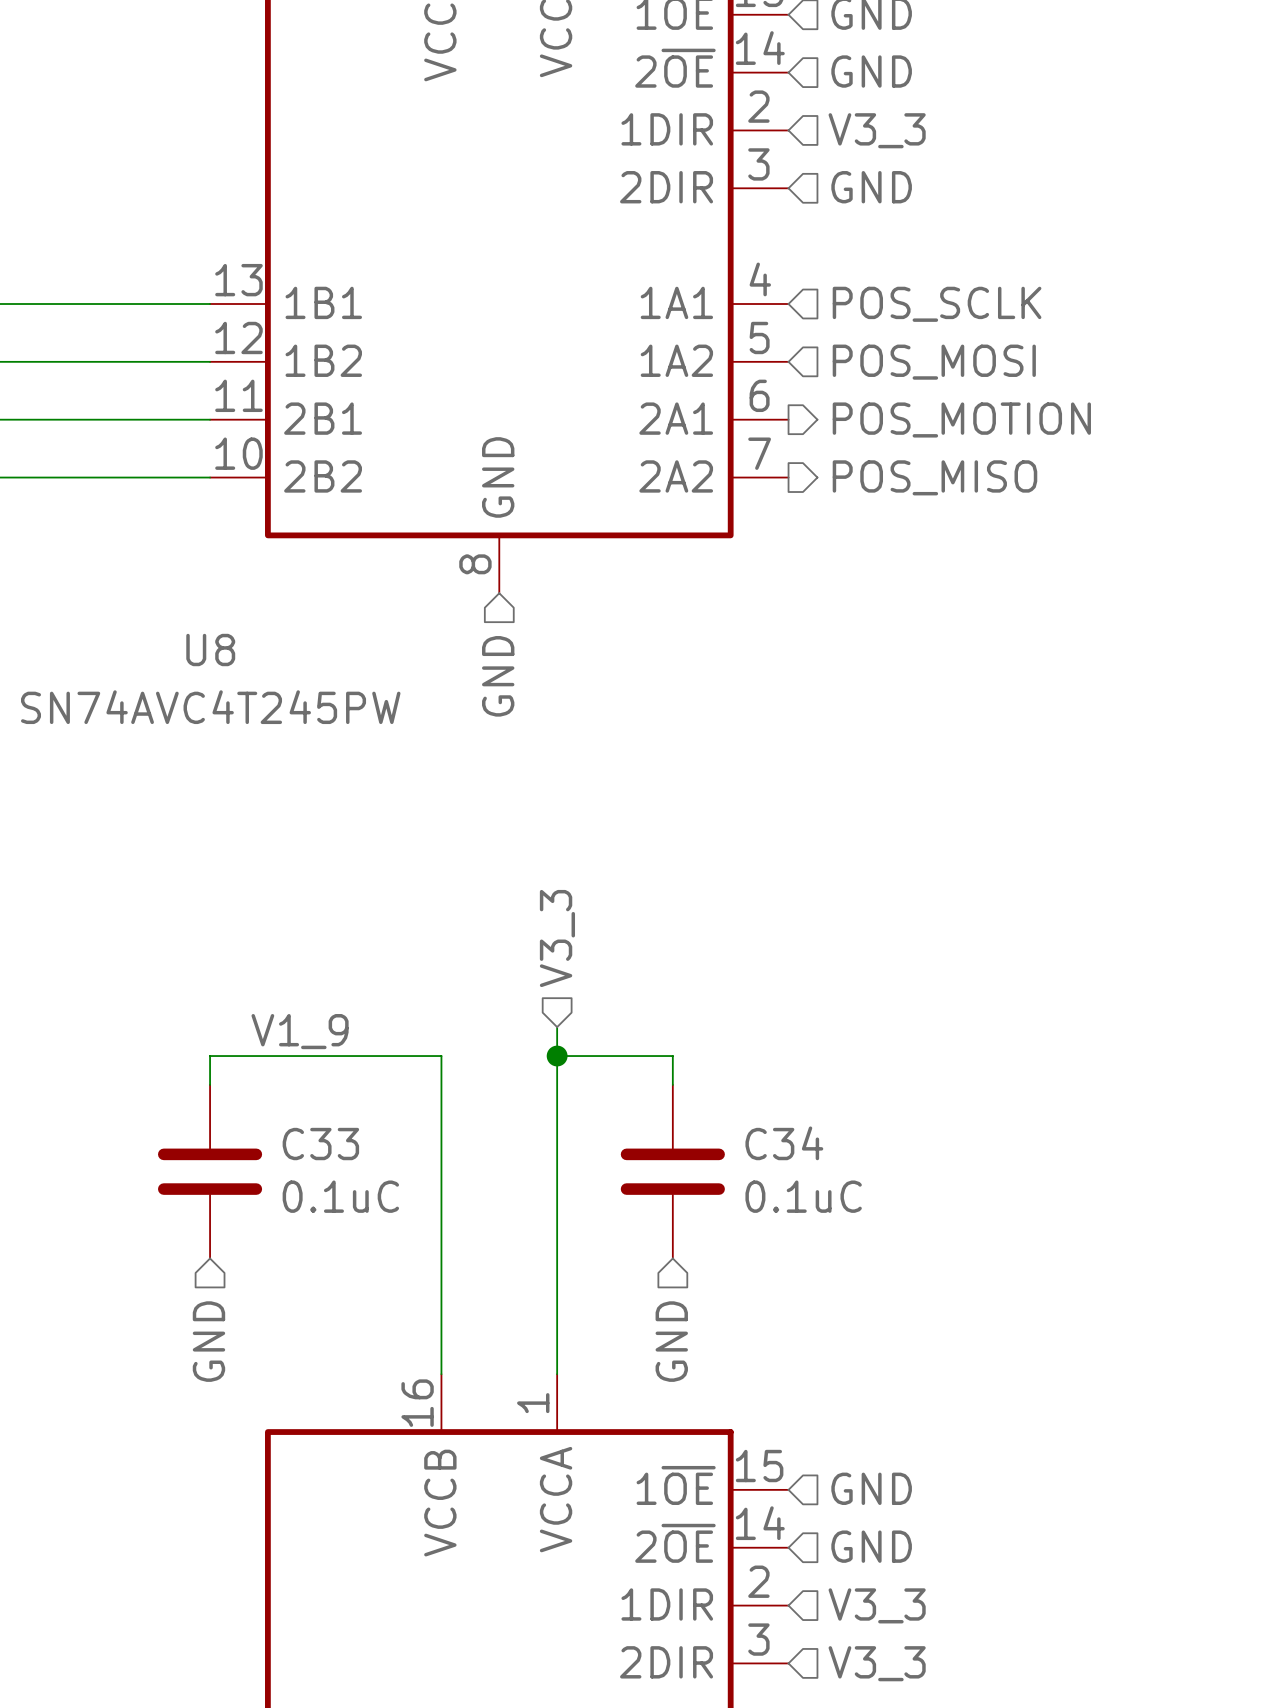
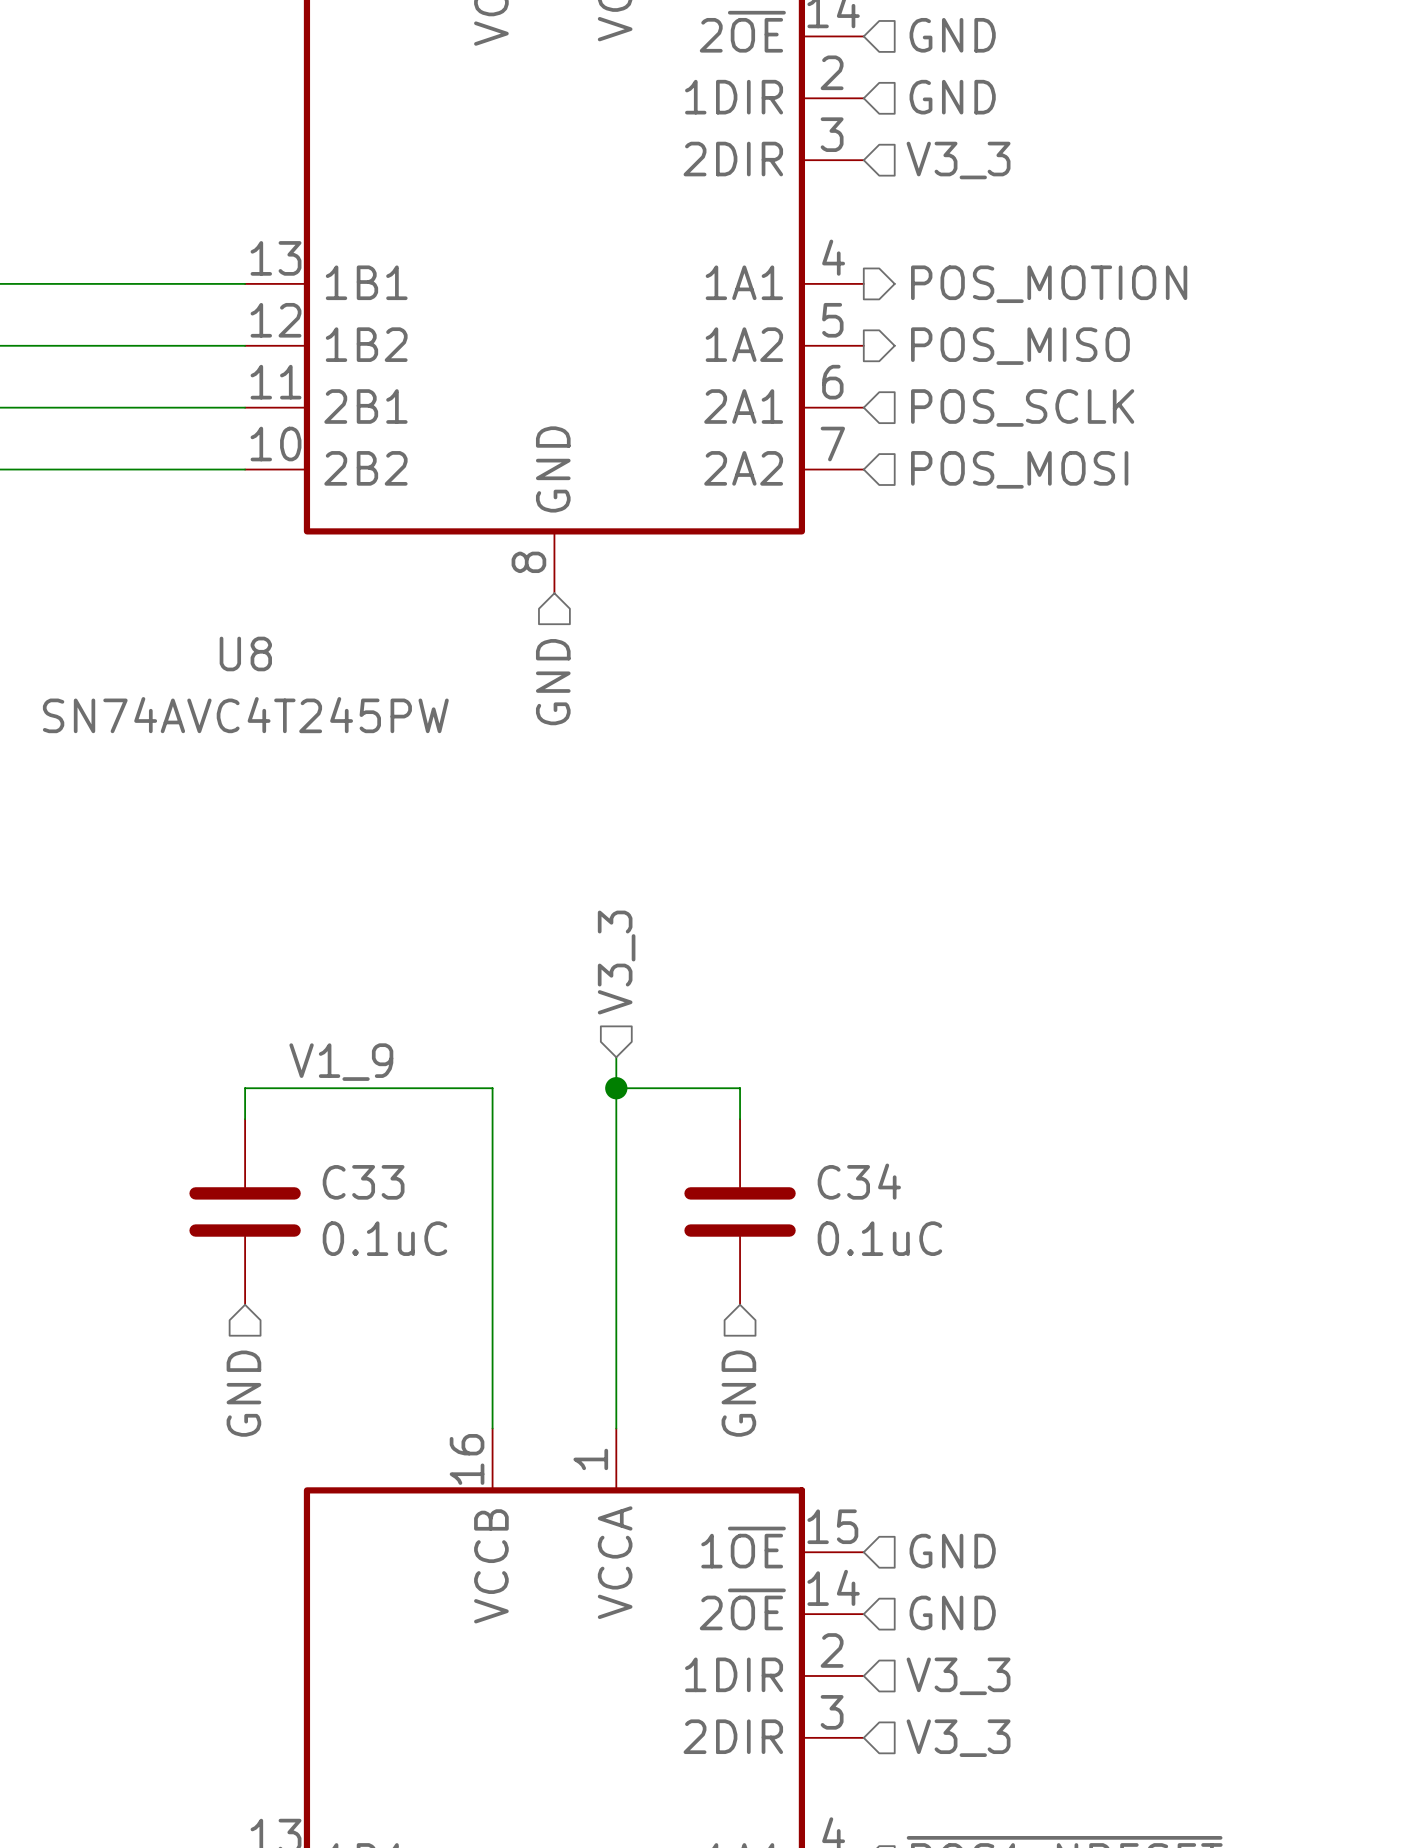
hierarchical label: V3_3 (877, 130) -> GND (952, 97)
hierarchical label: GND (871, 187) -> V3_3 (958, 160)
hierarchical label shape: input (937, 304) -> output (1049, 284)
hierarchical label: POS_SCLK (937, 304) -> POS_MOTION (1049, 284)
hierarchical label shape: input (934, 362) -> output (1020, 346)
hierarchical label: POS_MOSI (934, 362) -> POS_MISO (1020, 346)
hierarchical label shape: output (961, 419) -> input (1022, 407)
hierarchical label: POS_MOTION (961, 419) -> POS_SCLK (1022, 407)
hierarchical label shape: output (934, 477) -> input (1019, 469)
hierarchical label: POS_MISO (934, 477) -> POS_MOSI (1019, 469)

